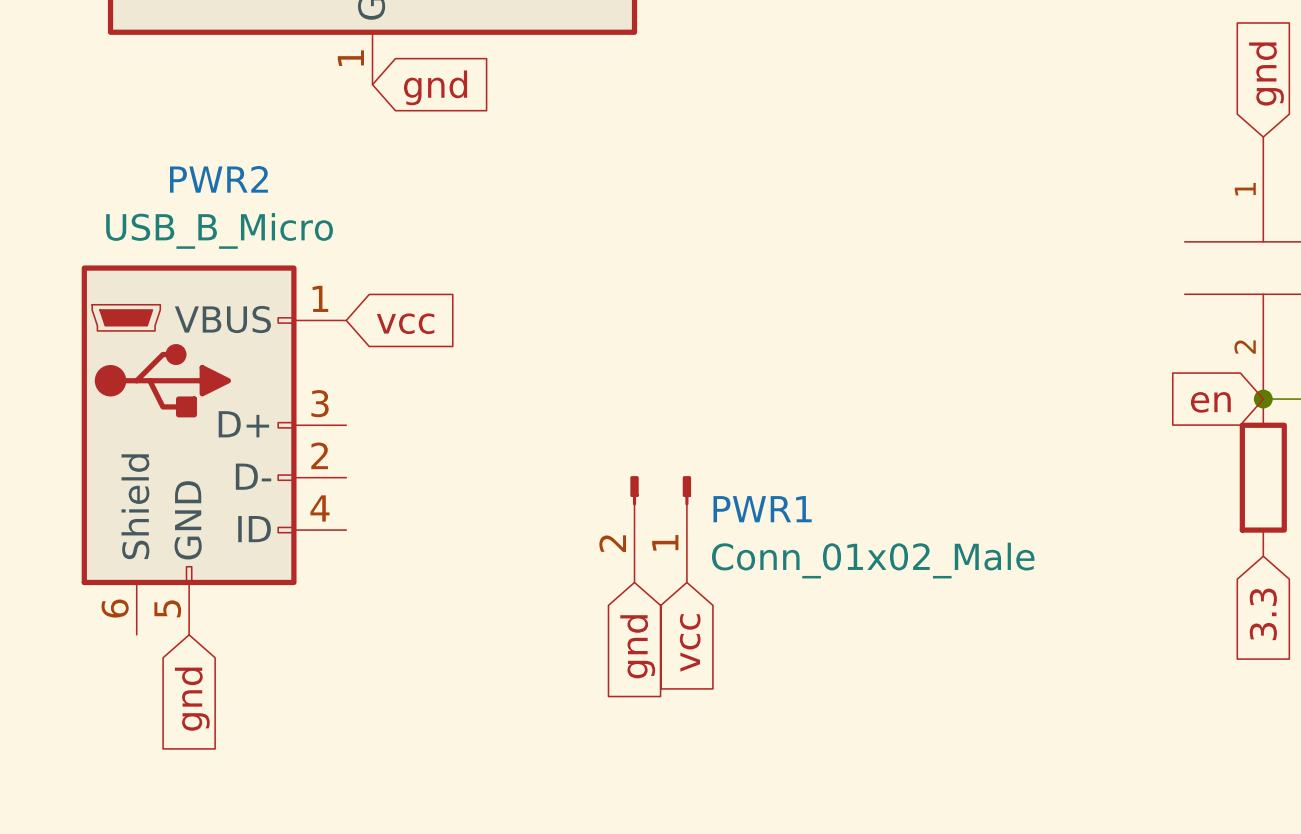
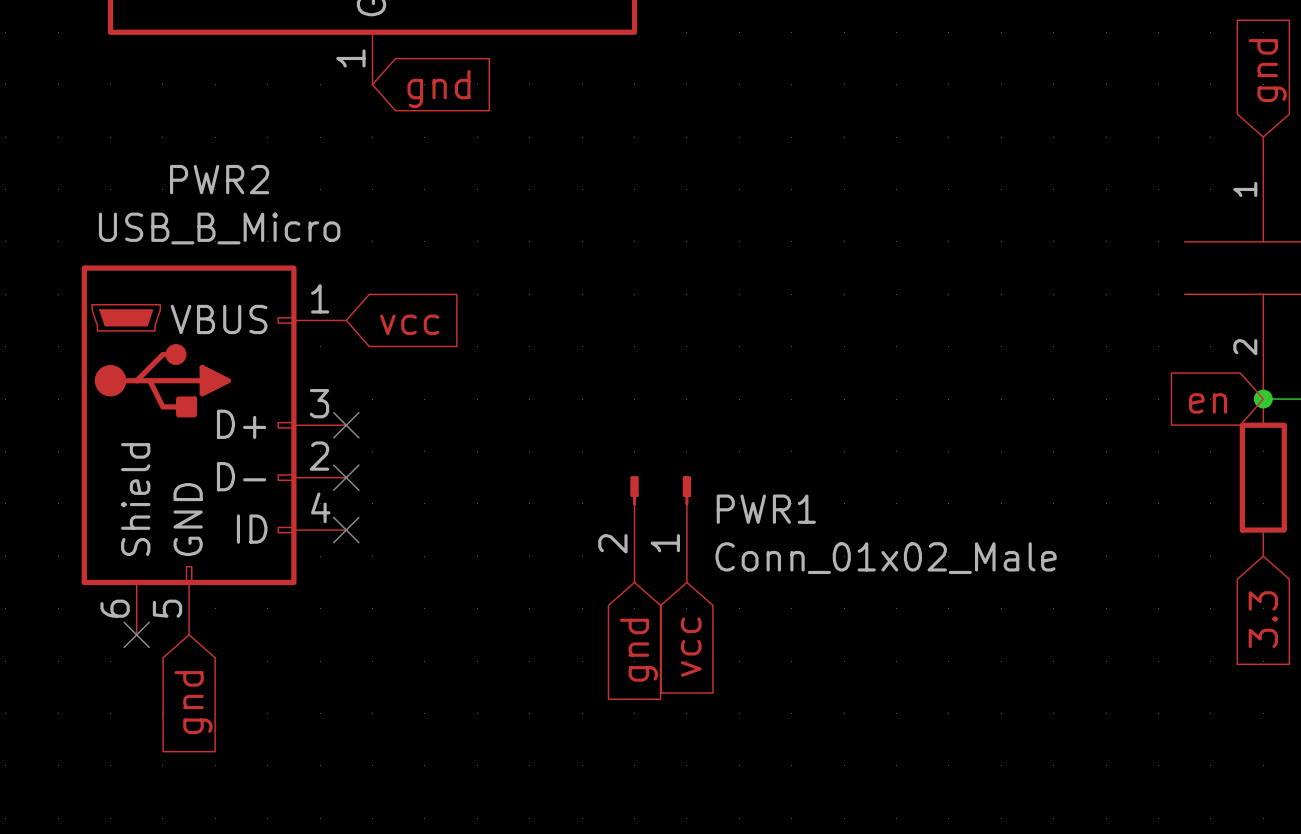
no-connect mark: none -> (346, 425)
no-connect mark: none -> (346, 477)
no-connect mark: none -> (346, 530)
no-connect mark: none -> (136, 634)

